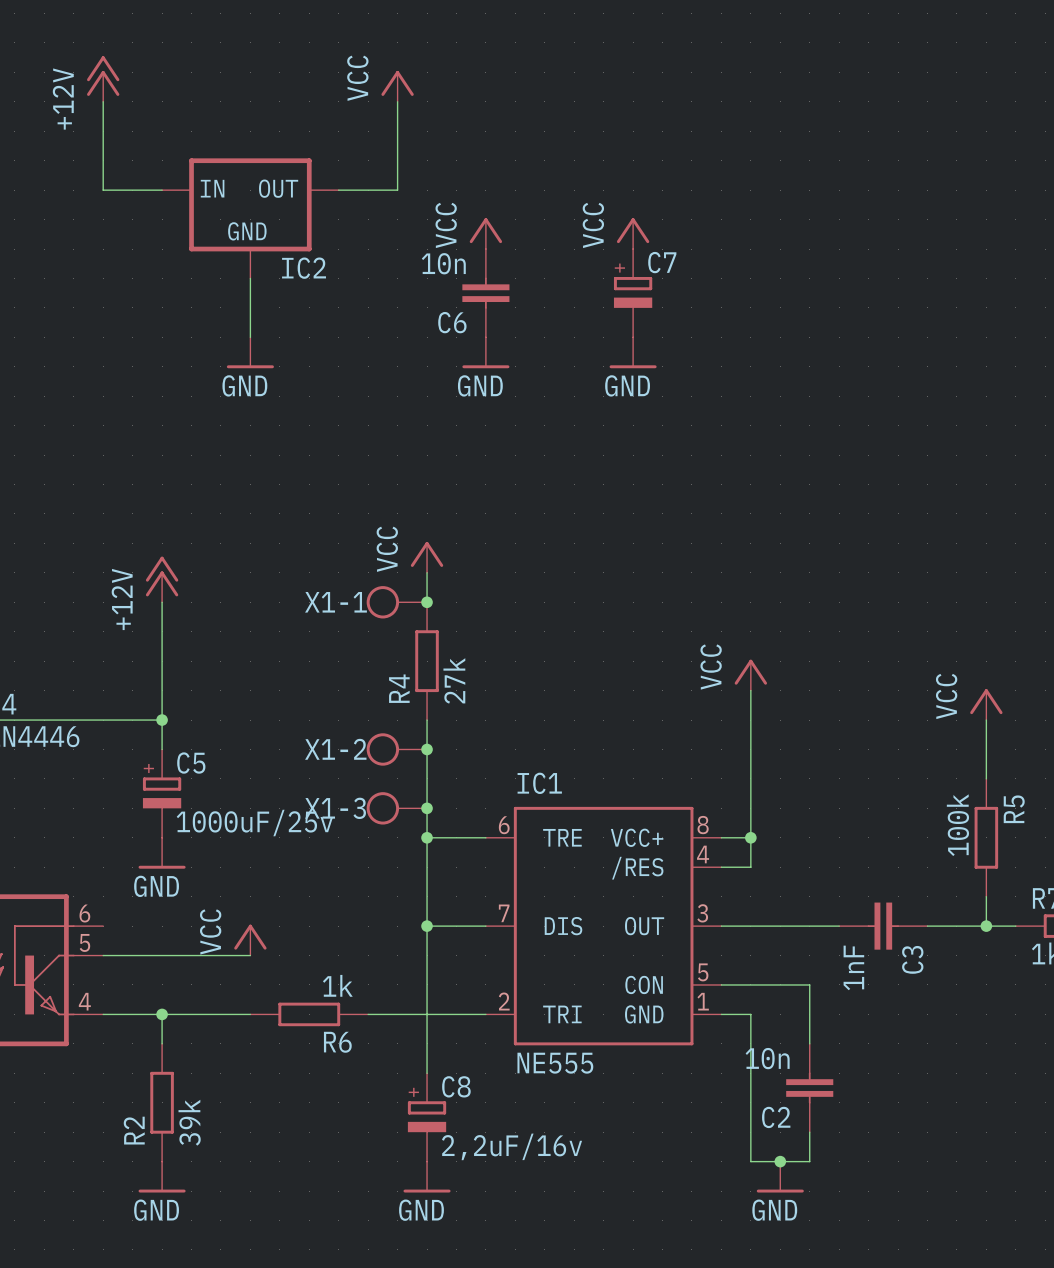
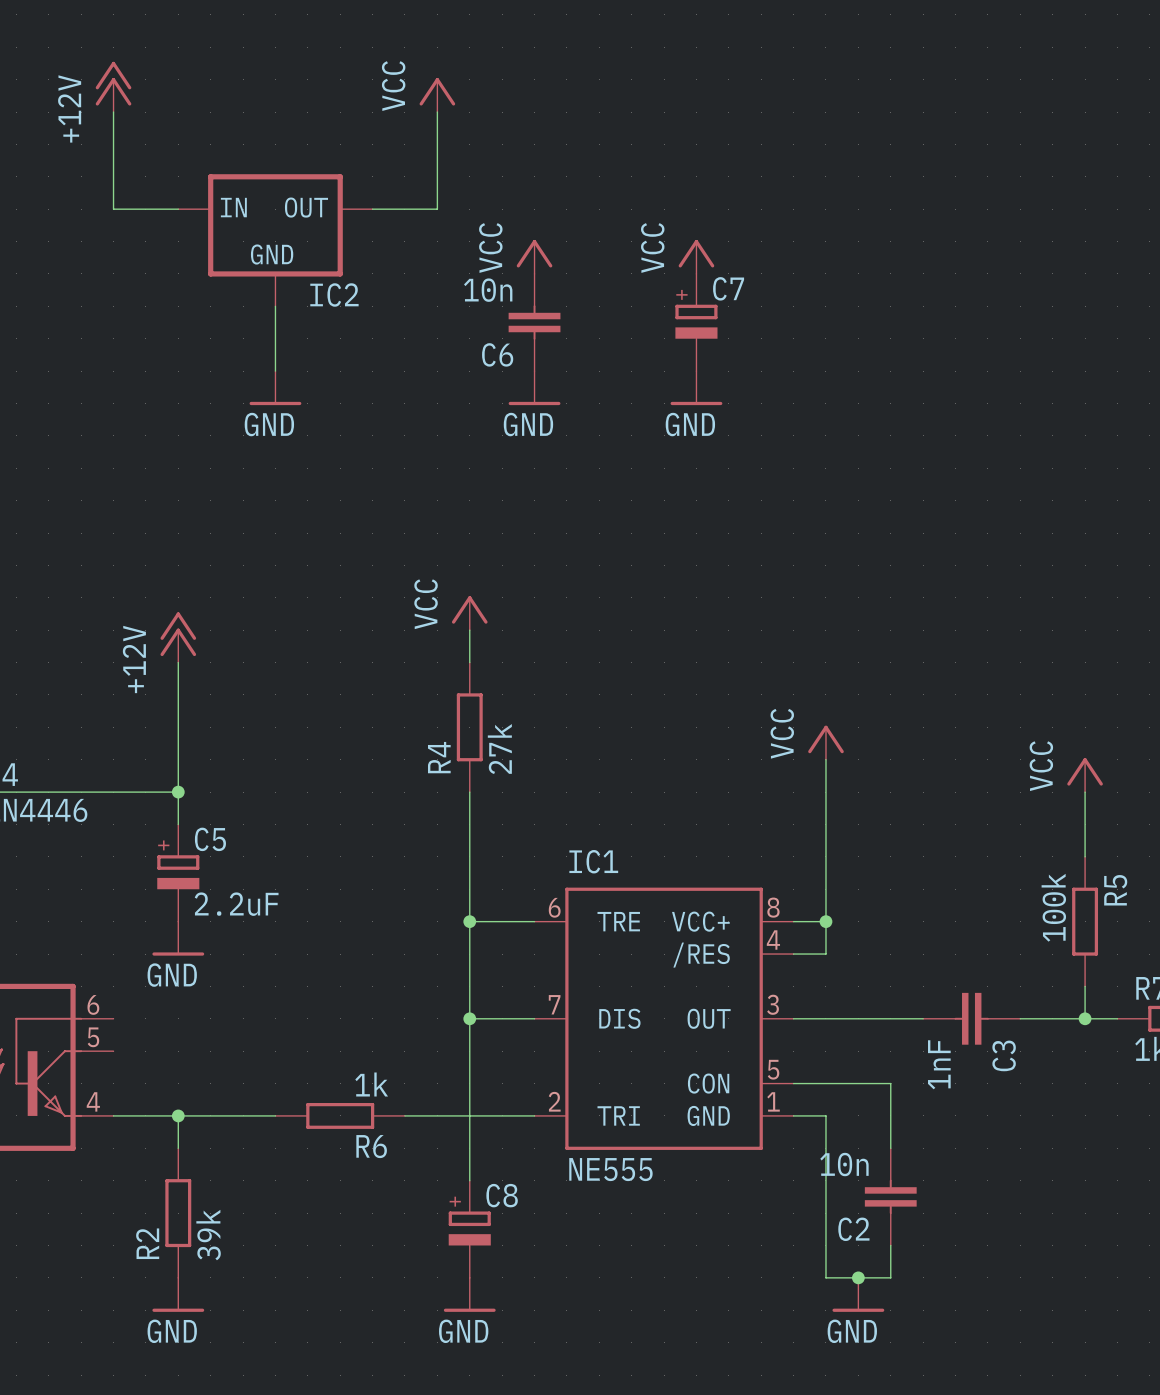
X1-1: (396, 602) -> none
junction: (427, 602) -> none
X1-2: (396, 749) -> none
junction: (427, 749) -> none
X1-3: (396, 808) -> none
junction: (427, 808) -> none
C5 value: 1000uF/25v (254, 823) -> 2.2uF (236, 904)
power symbol: VCC (250, 940) -> none
wire: (103, 955) (250, 955) -> none
C8 value: 2,2uF/16v (512, 1146) -> none

